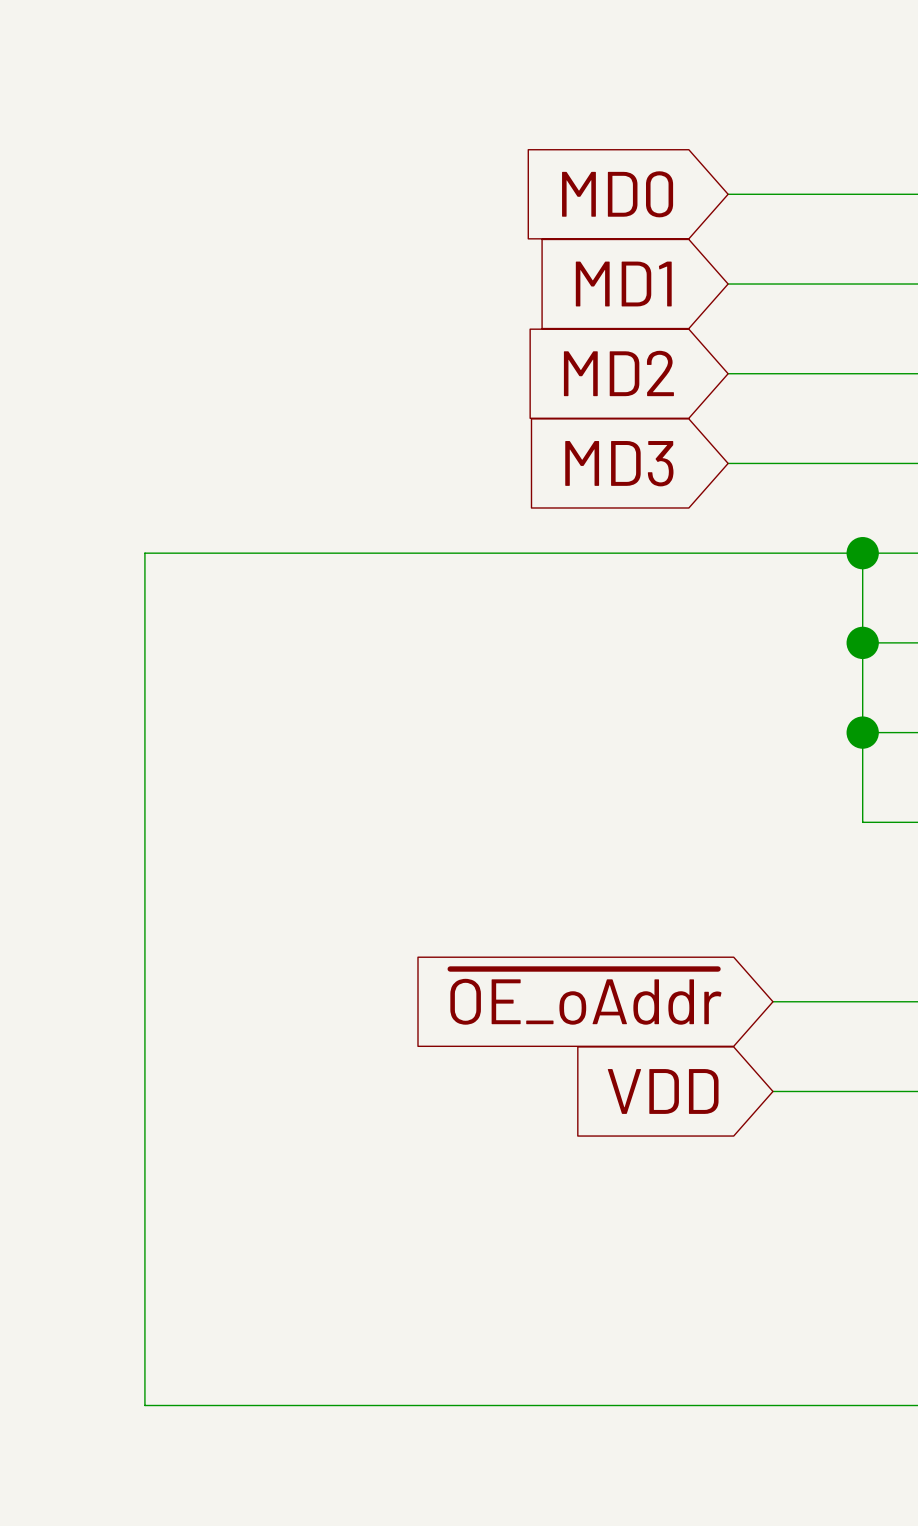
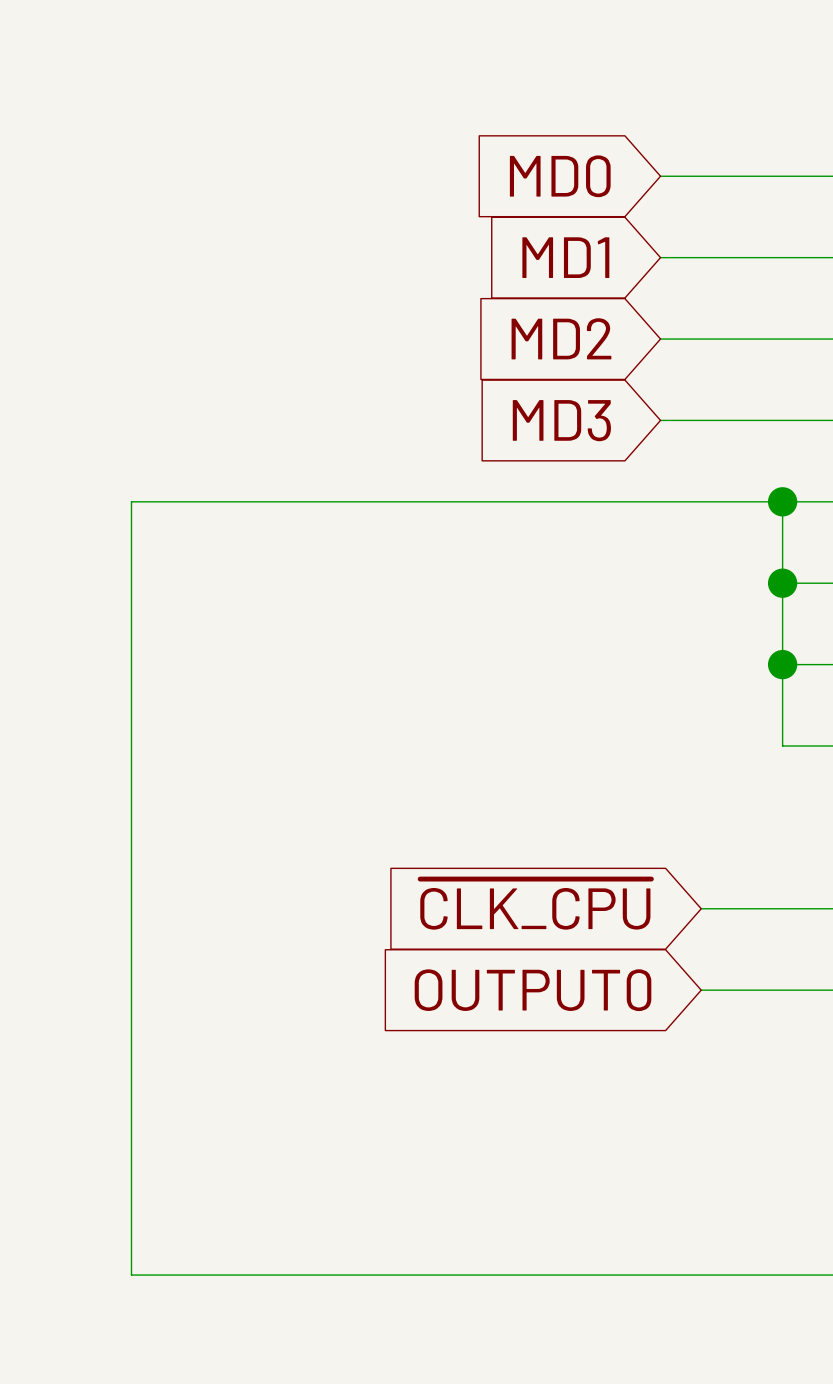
global label: ~{OE_oAddr} (585, 996) -> ~{CLK_CPU} (535, 904)
global label: VDD (663, 1091) -> OUTPUT0 (533, 990)

